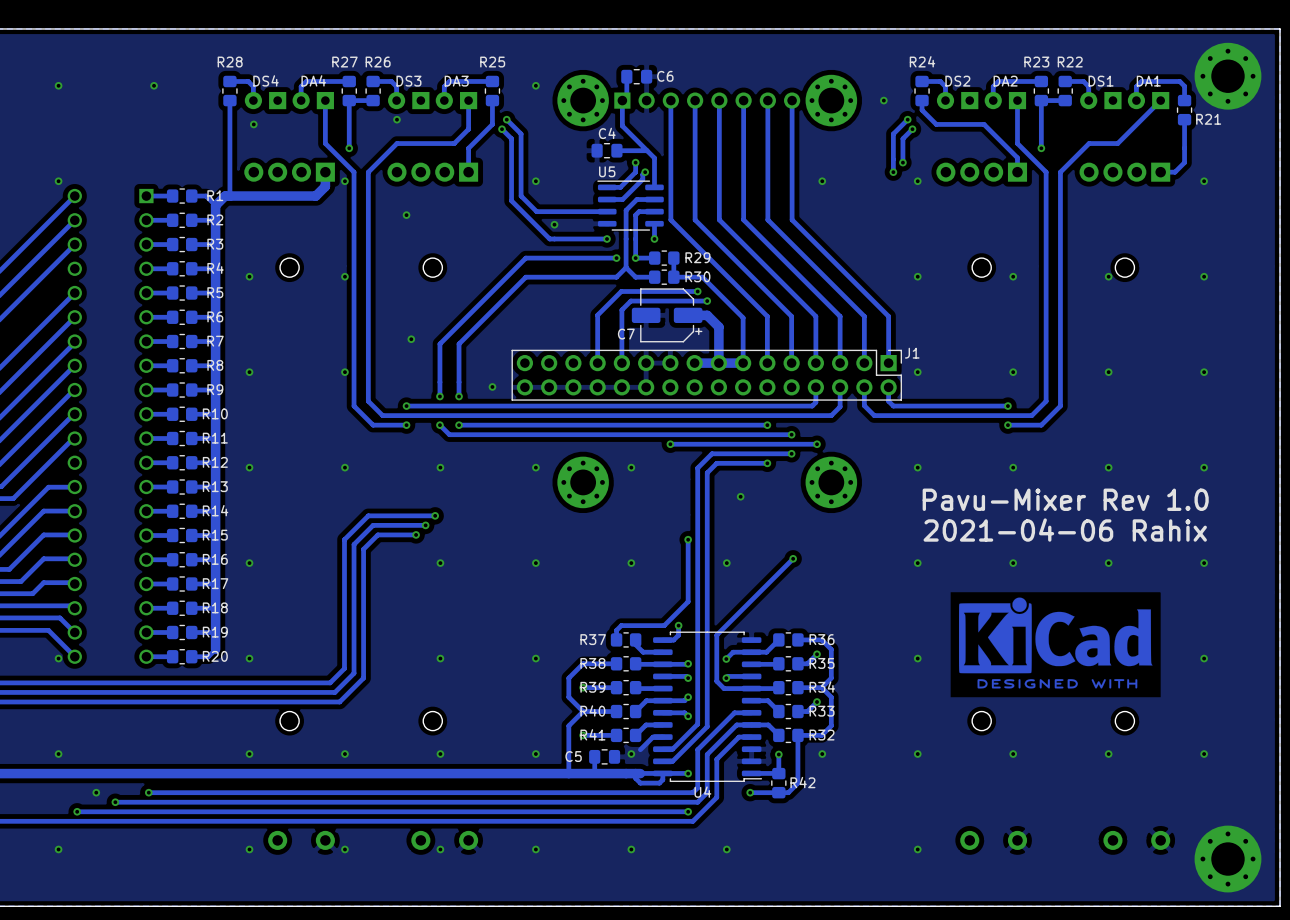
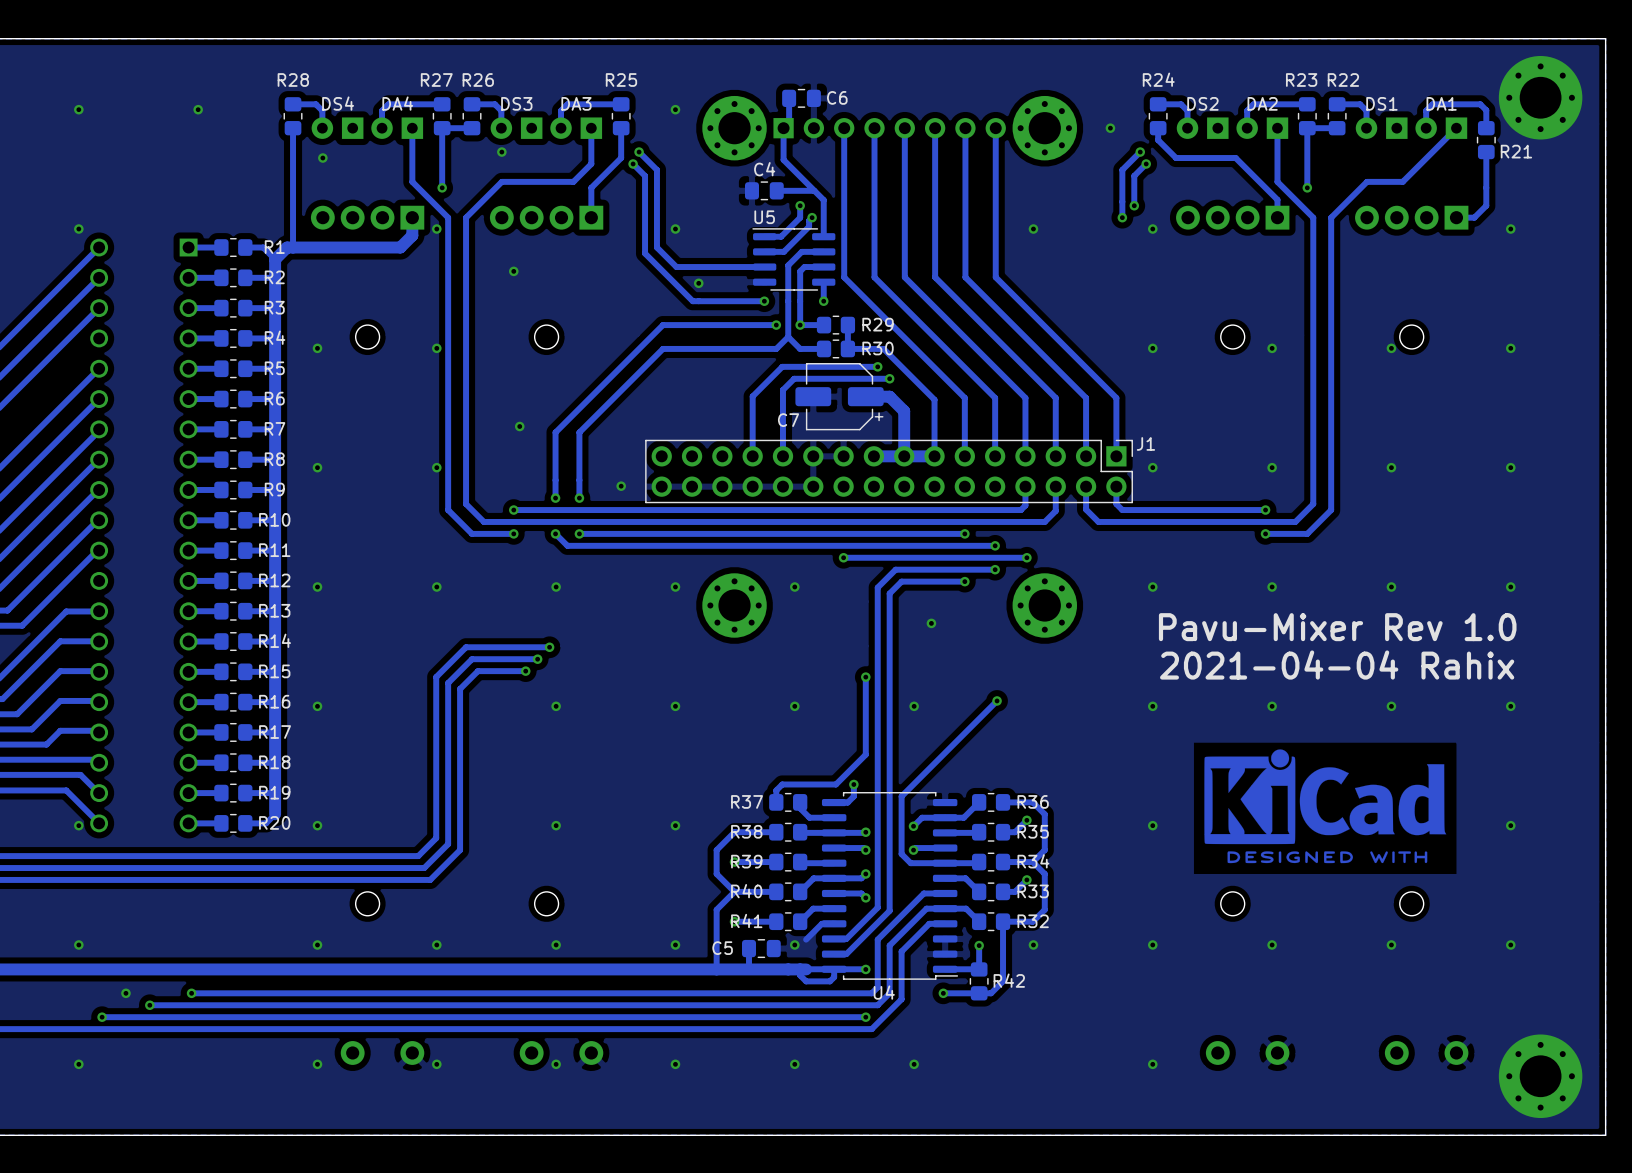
text: 2021-04-06 Rahix (1065, 530) -> 2021-04-04 Rahix (1337, 665)

